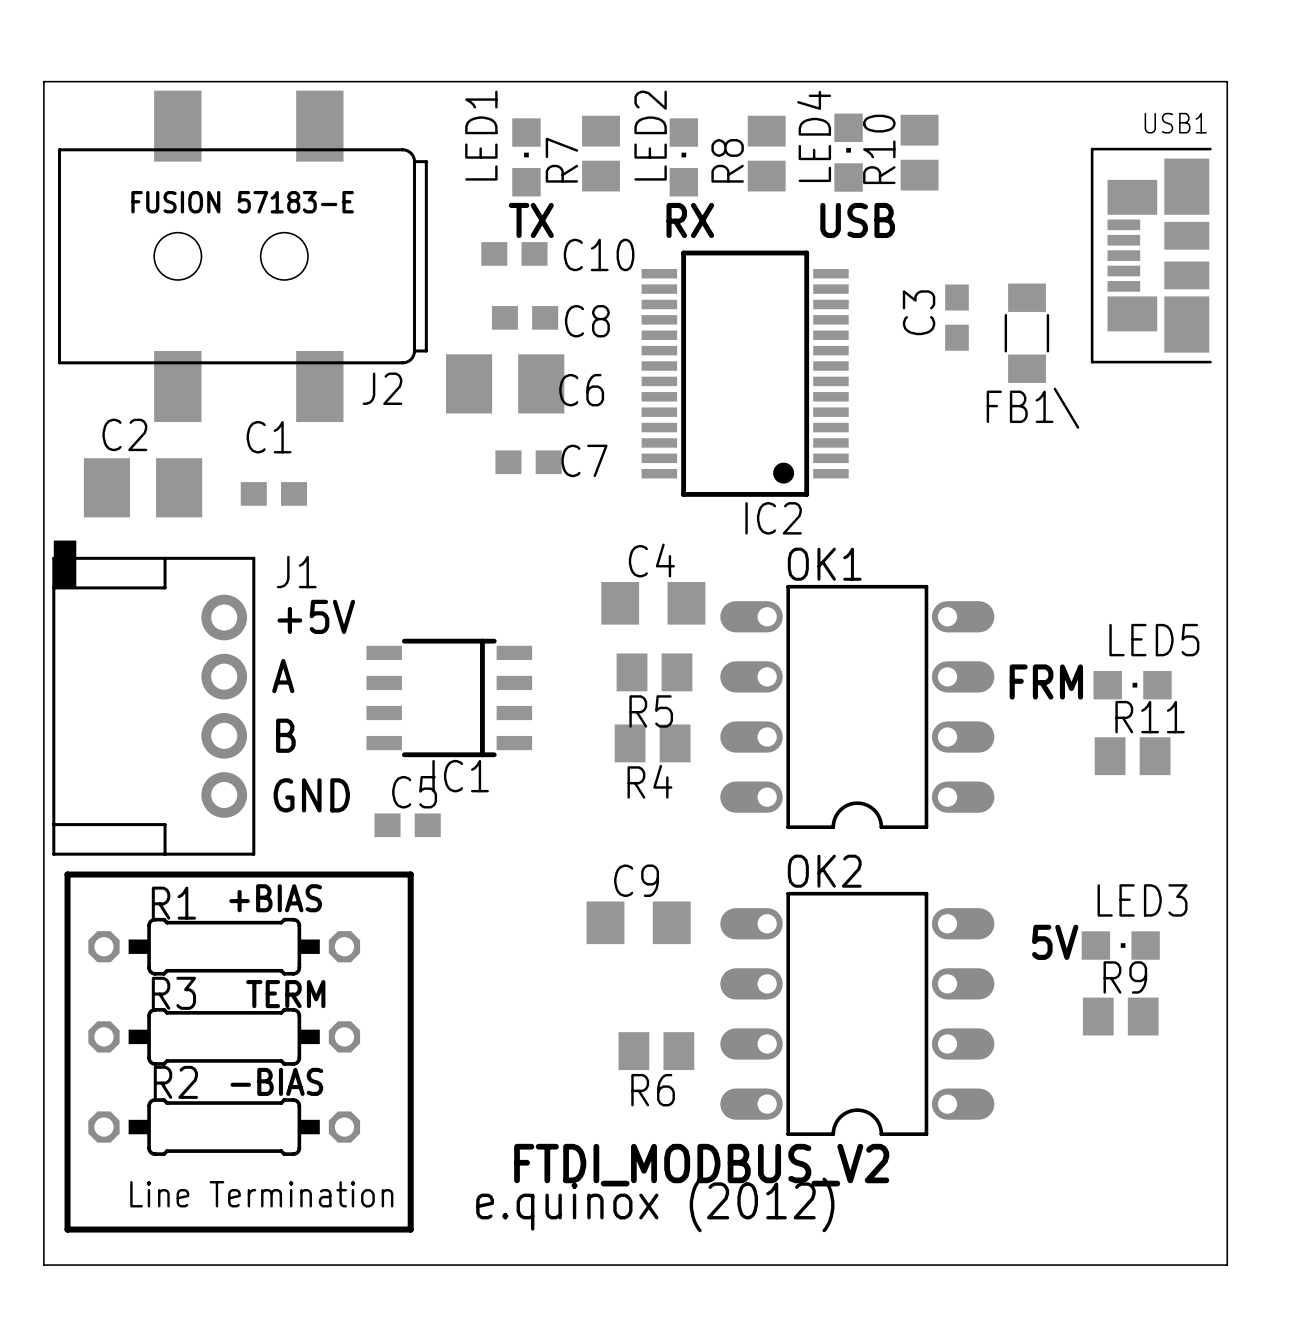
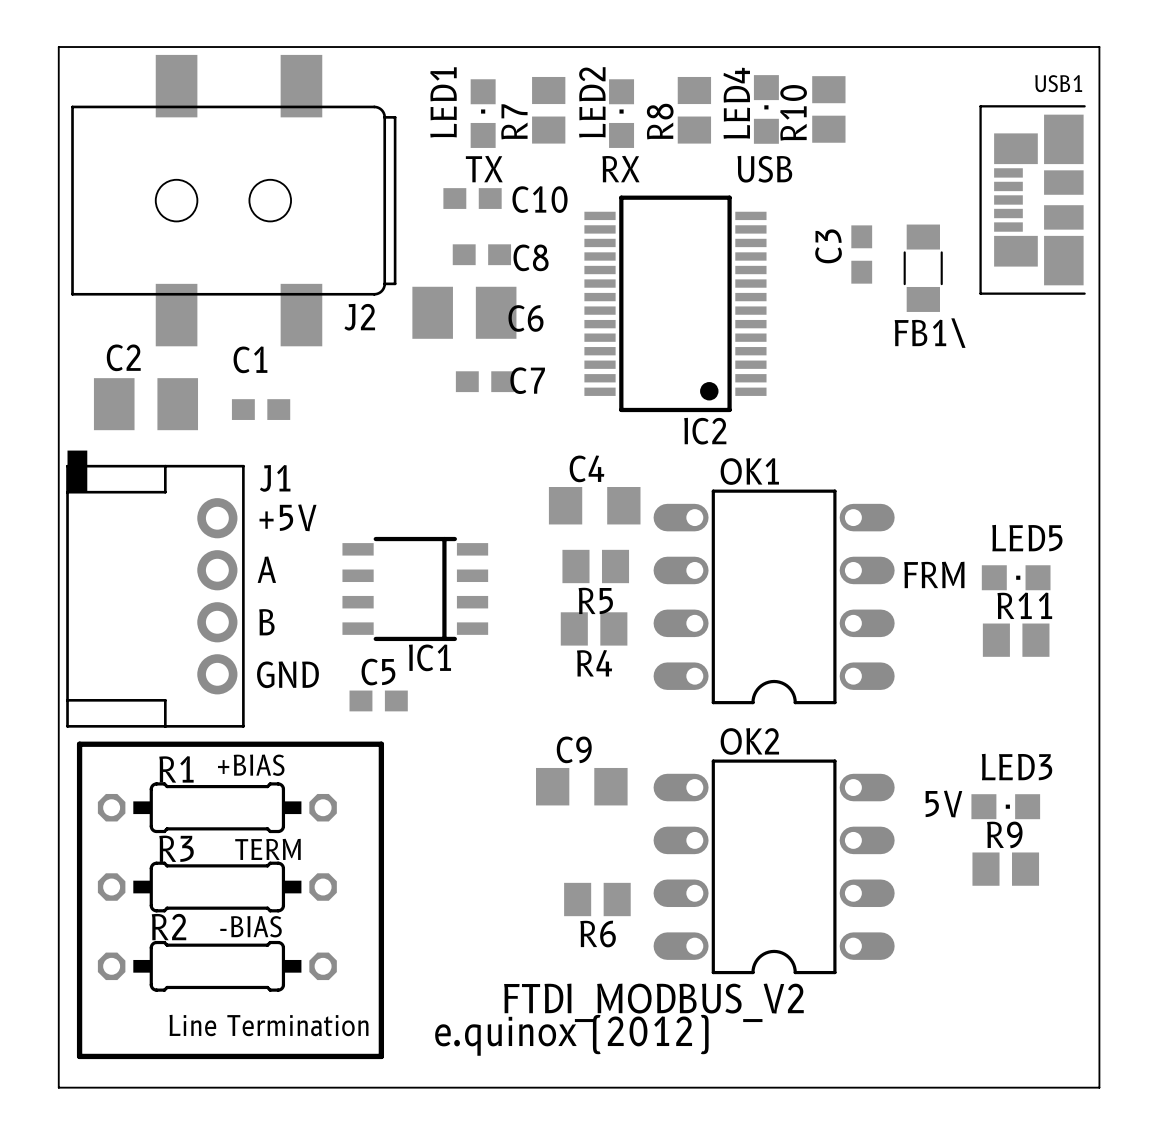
text: FUSION 57183-E (242, 202) -> none

